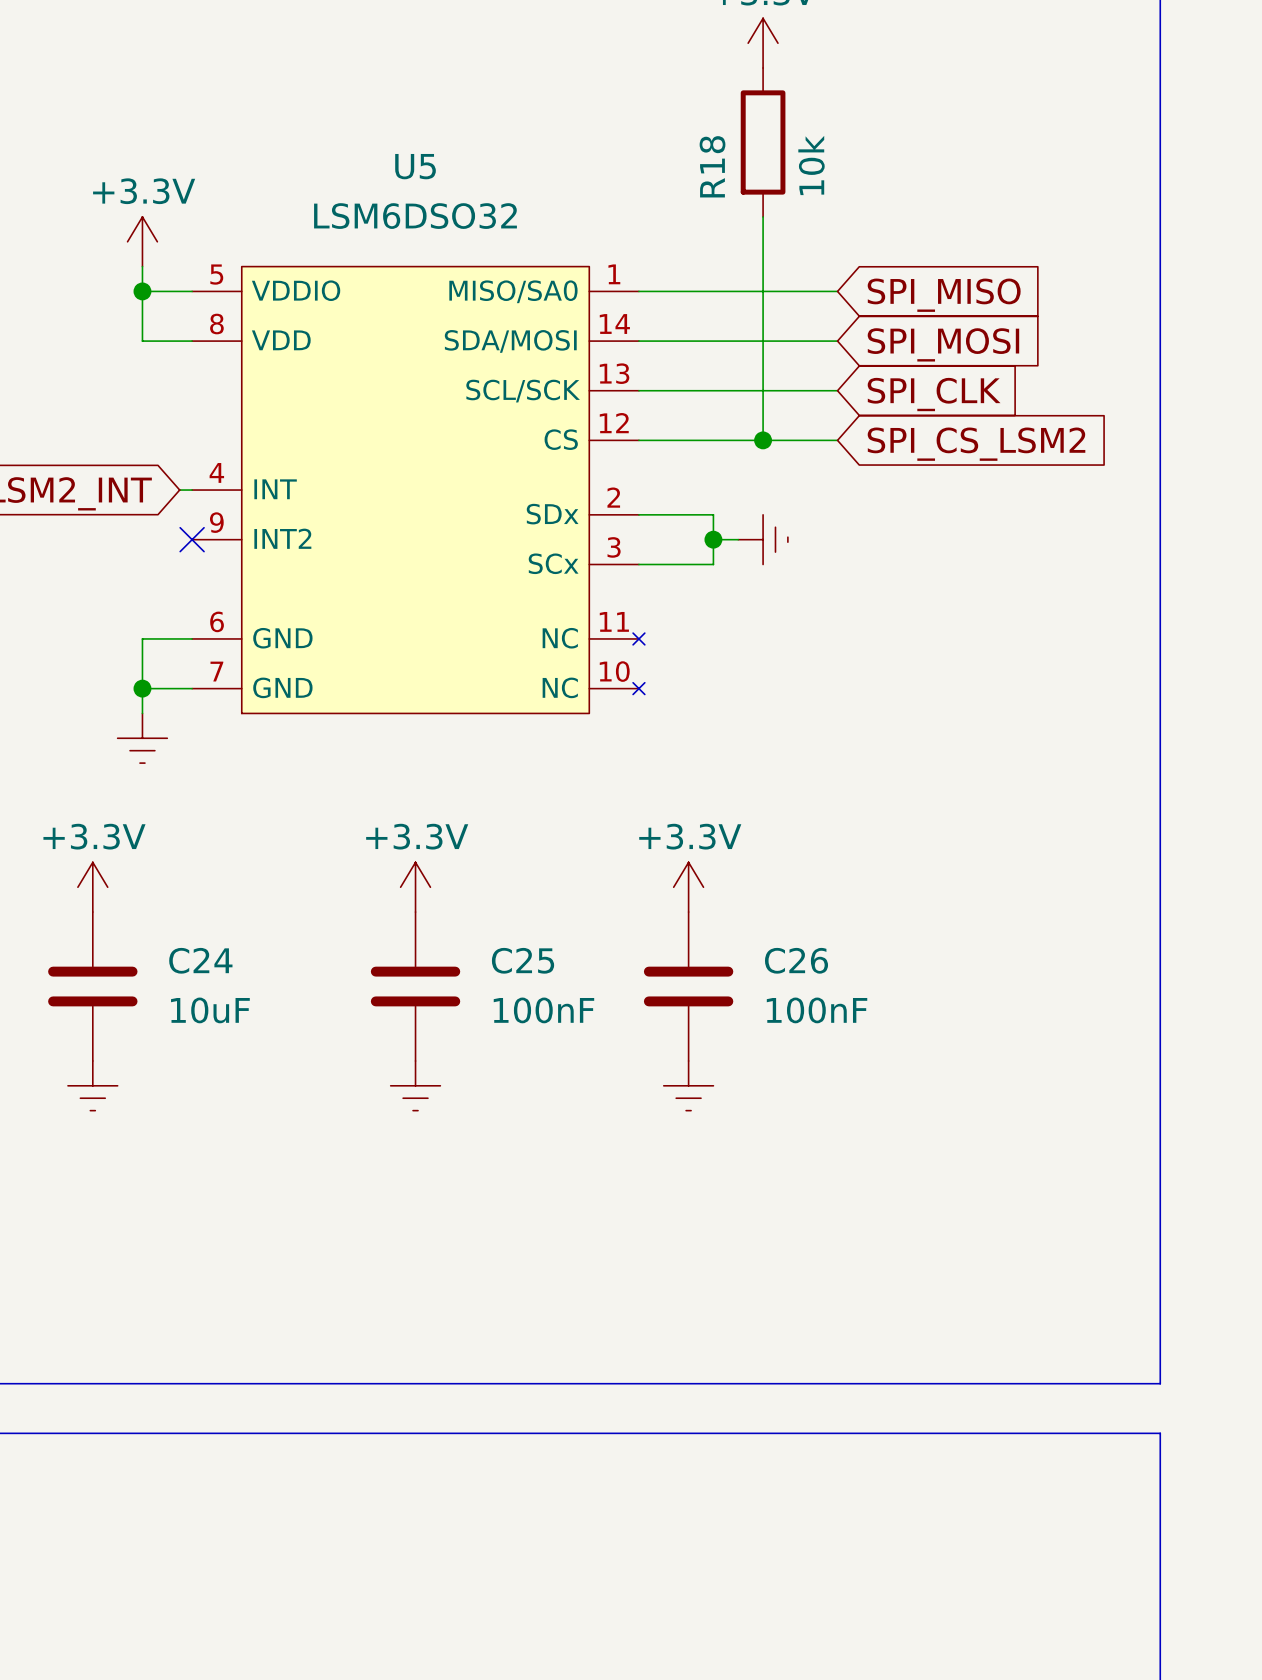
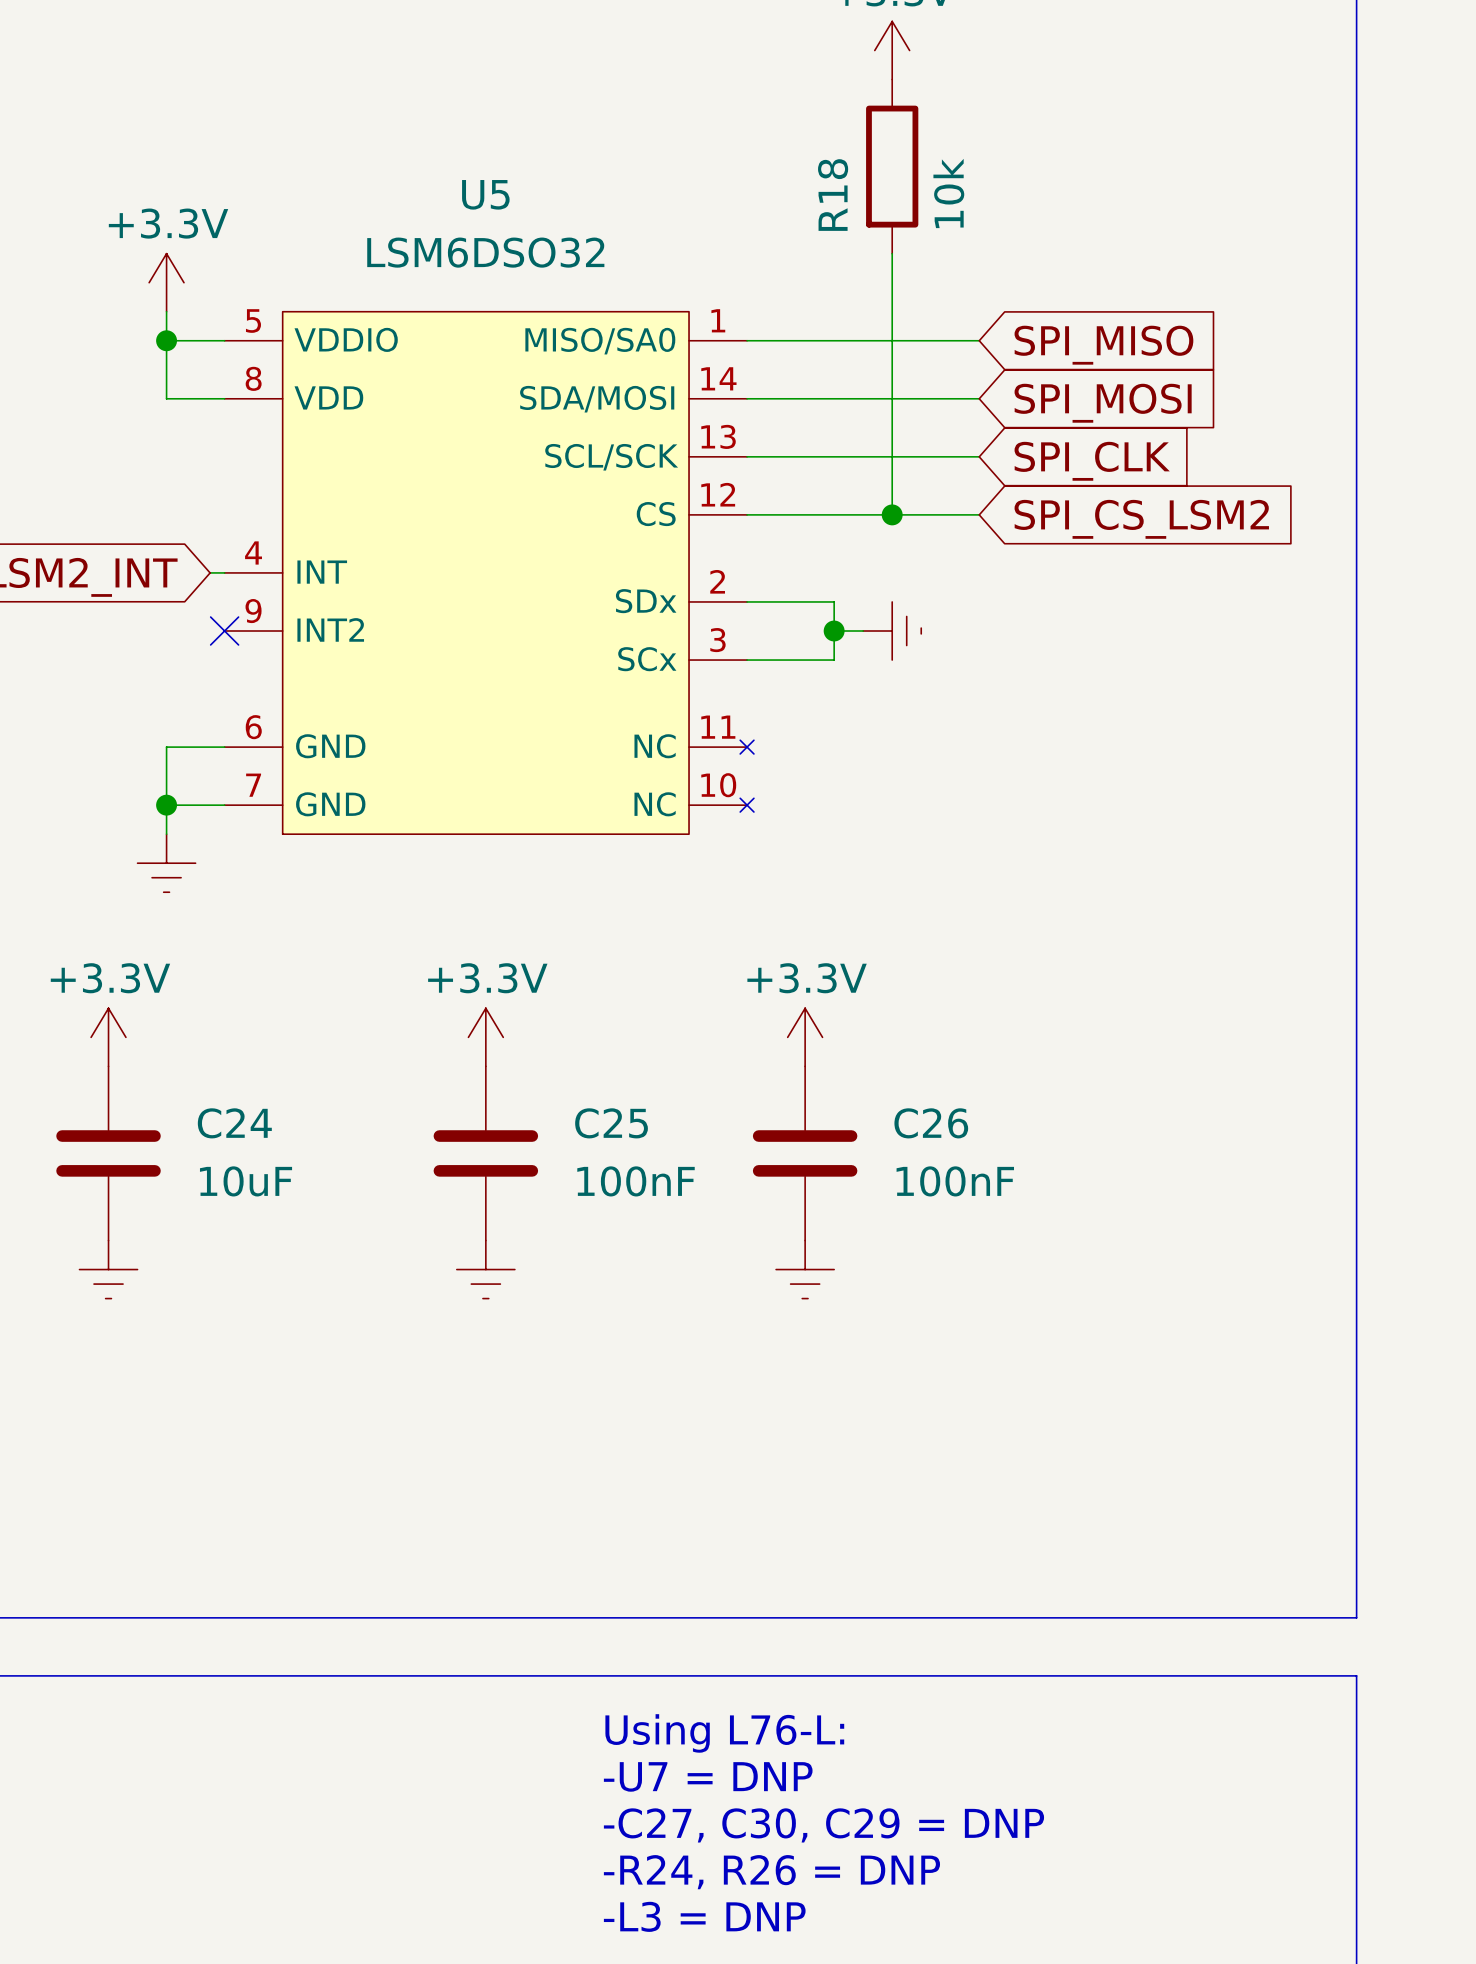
text: none -> Using L76-L: (724, 1733)
text: none -> -U7 = DNP (708, 1776)
text: none -> -C27, C30, C29 = DNP (823, 1825)
text: none -> -R24, R26 = DNP (771, 1872)
text: none -> -L3 = DNP (704, 1916)

